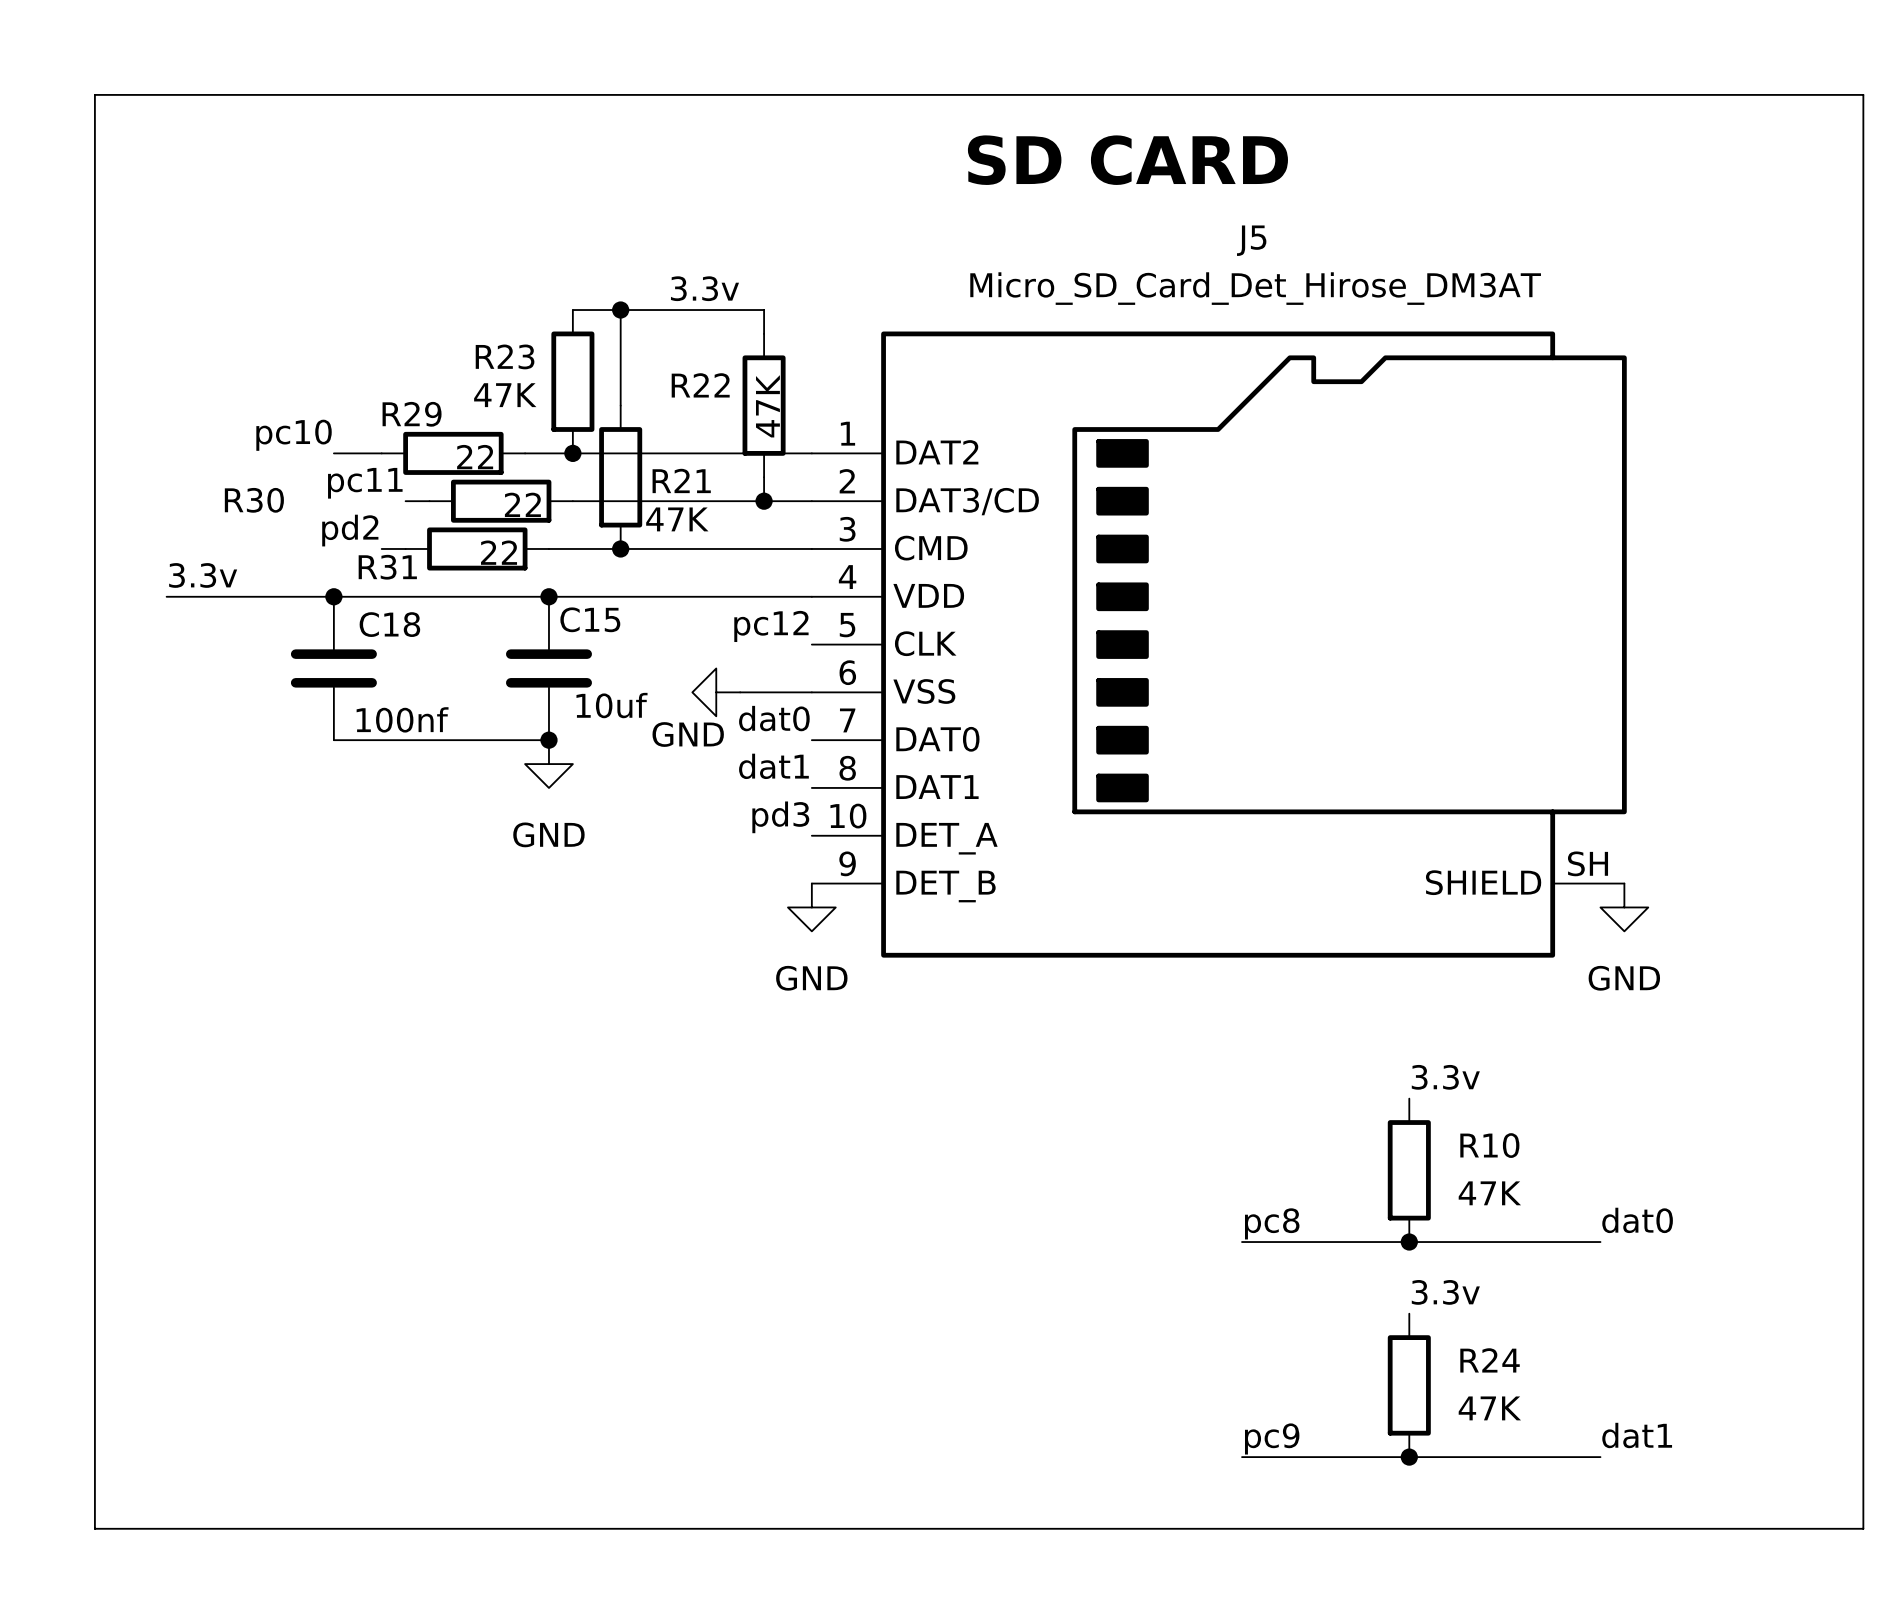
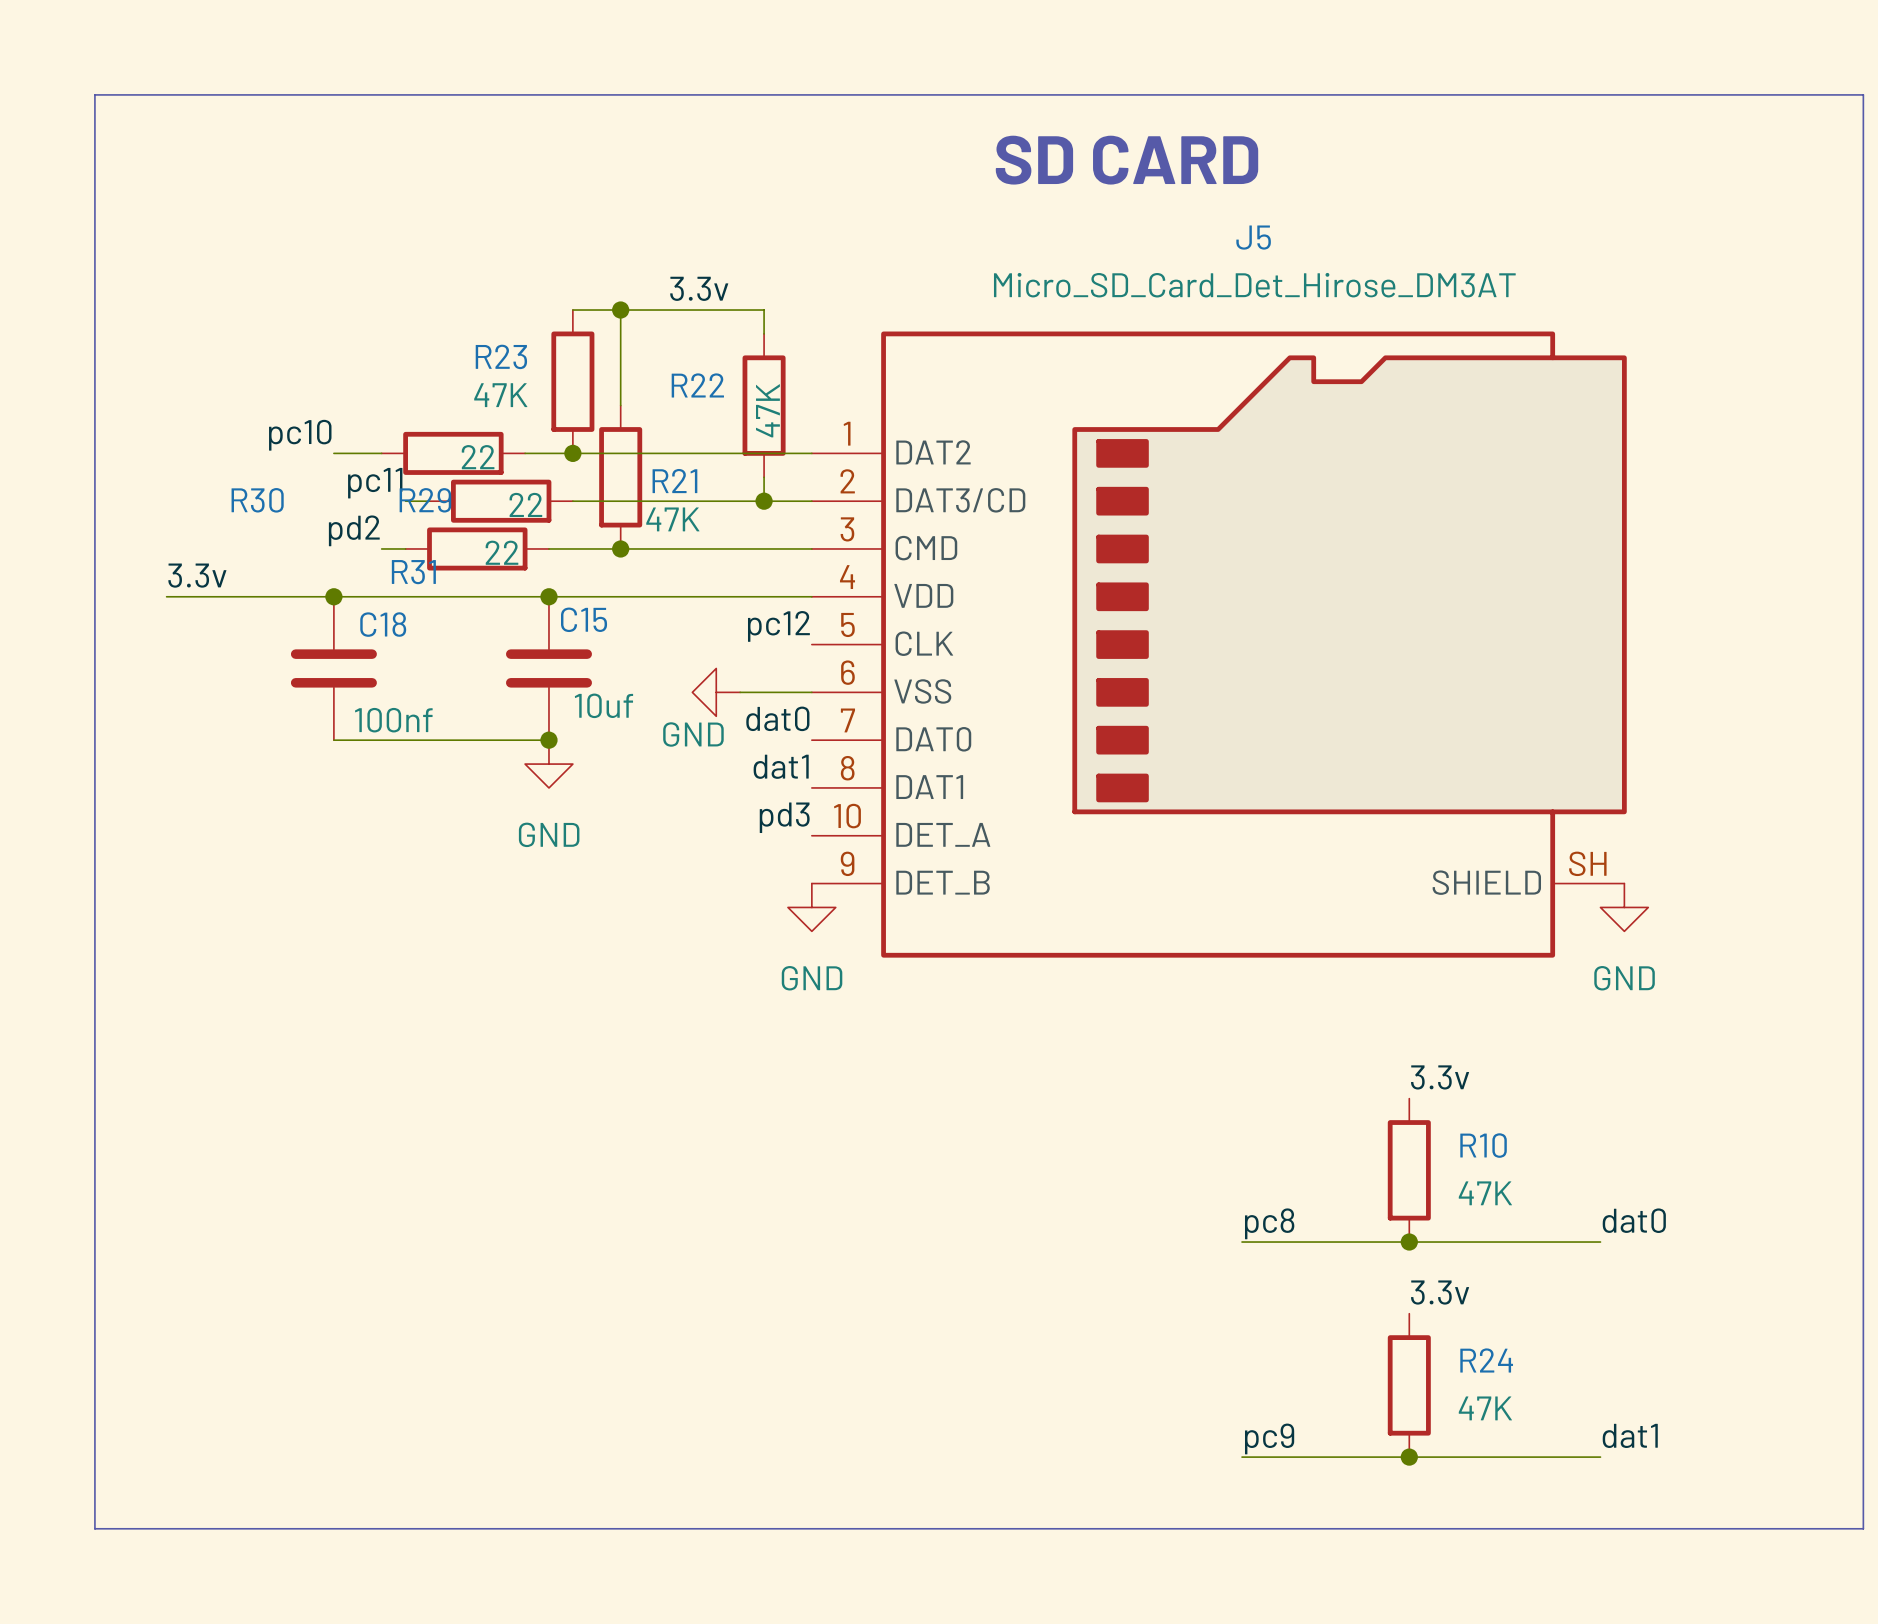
R29 name position: R29 (412, 414) -> R29 (425, 500)
R31 name position: R31 (387, 567) -> R31 (413, 572)

